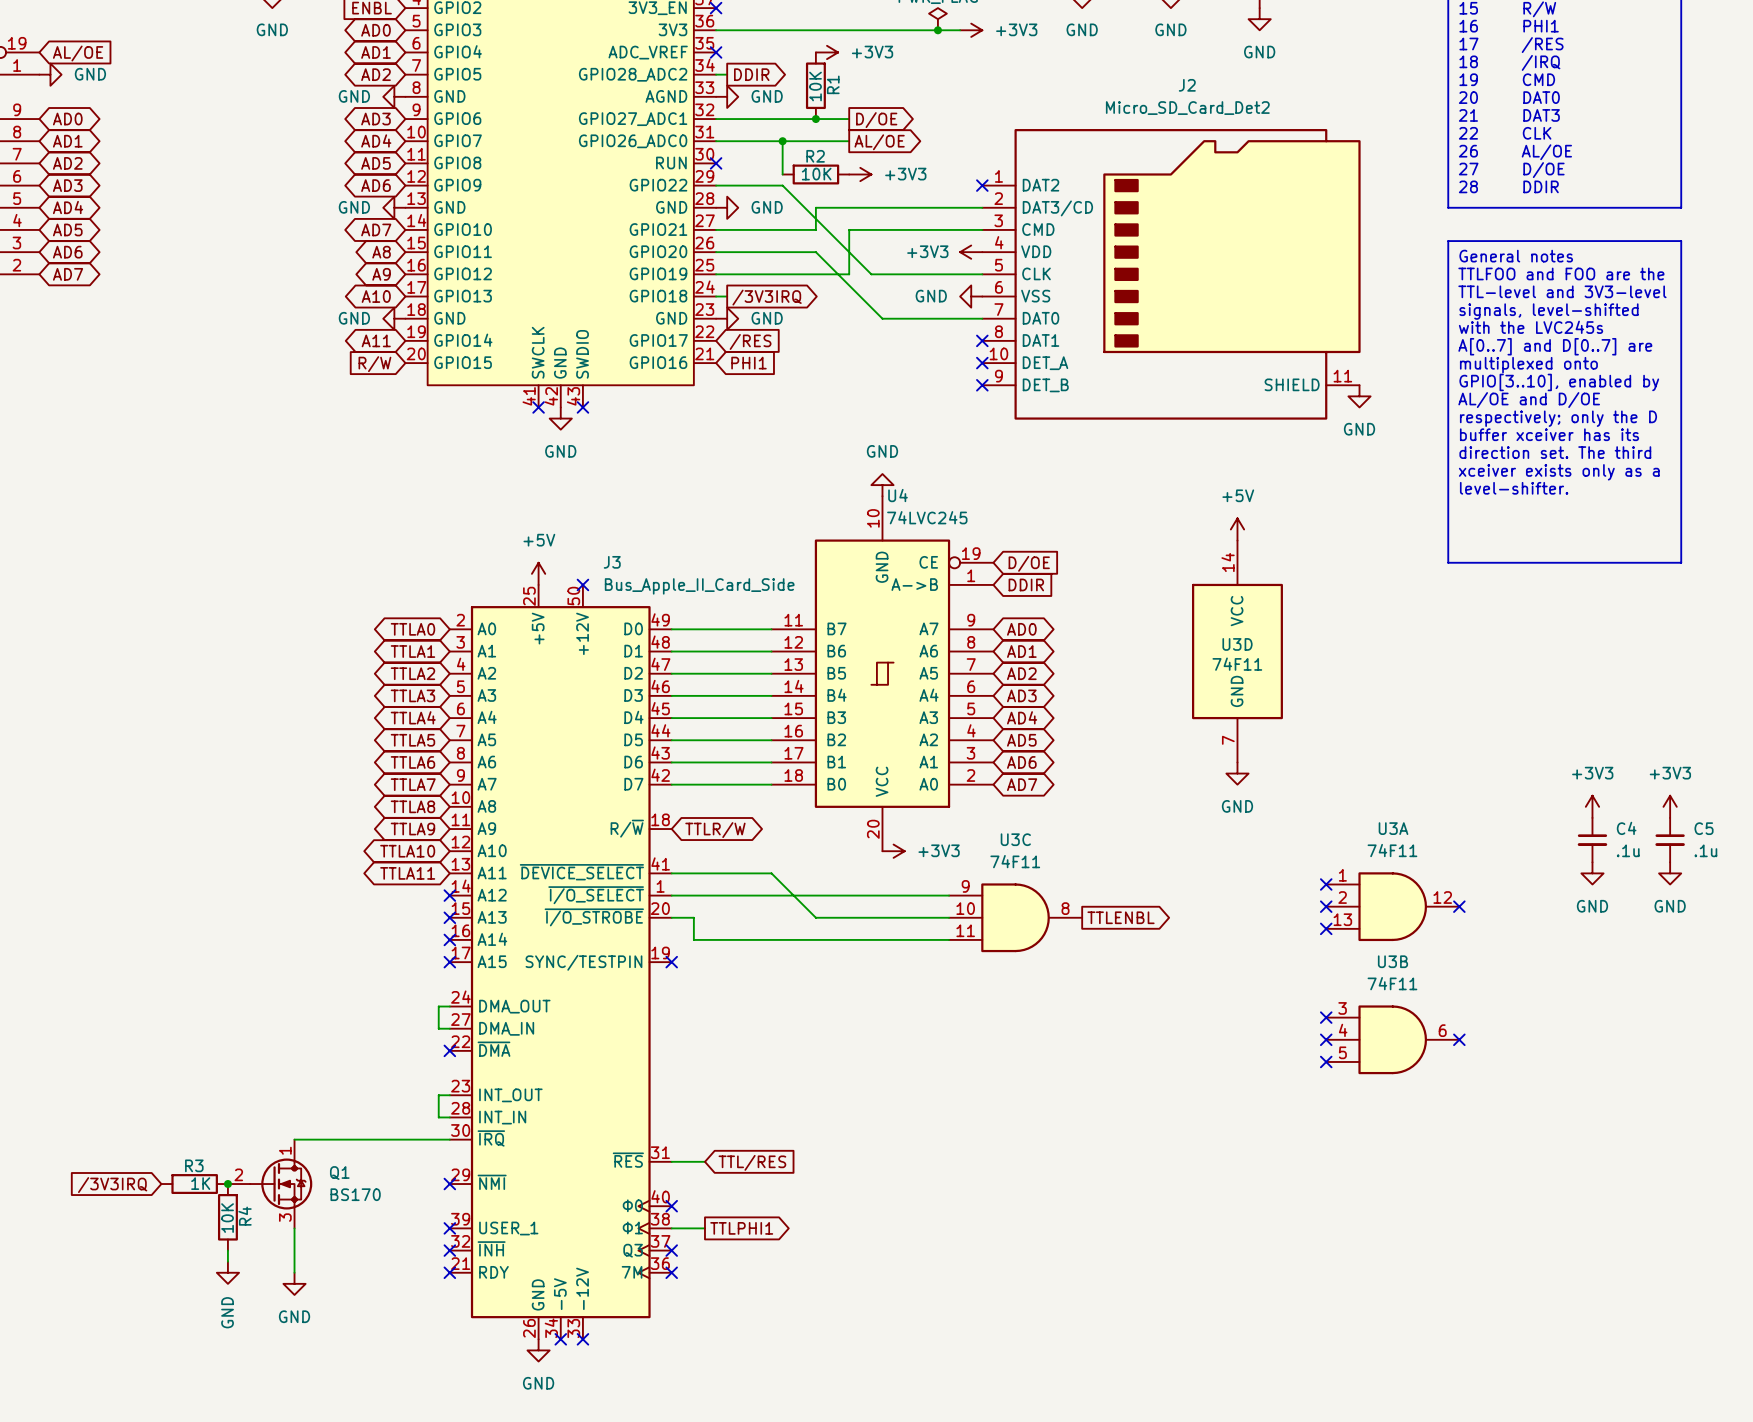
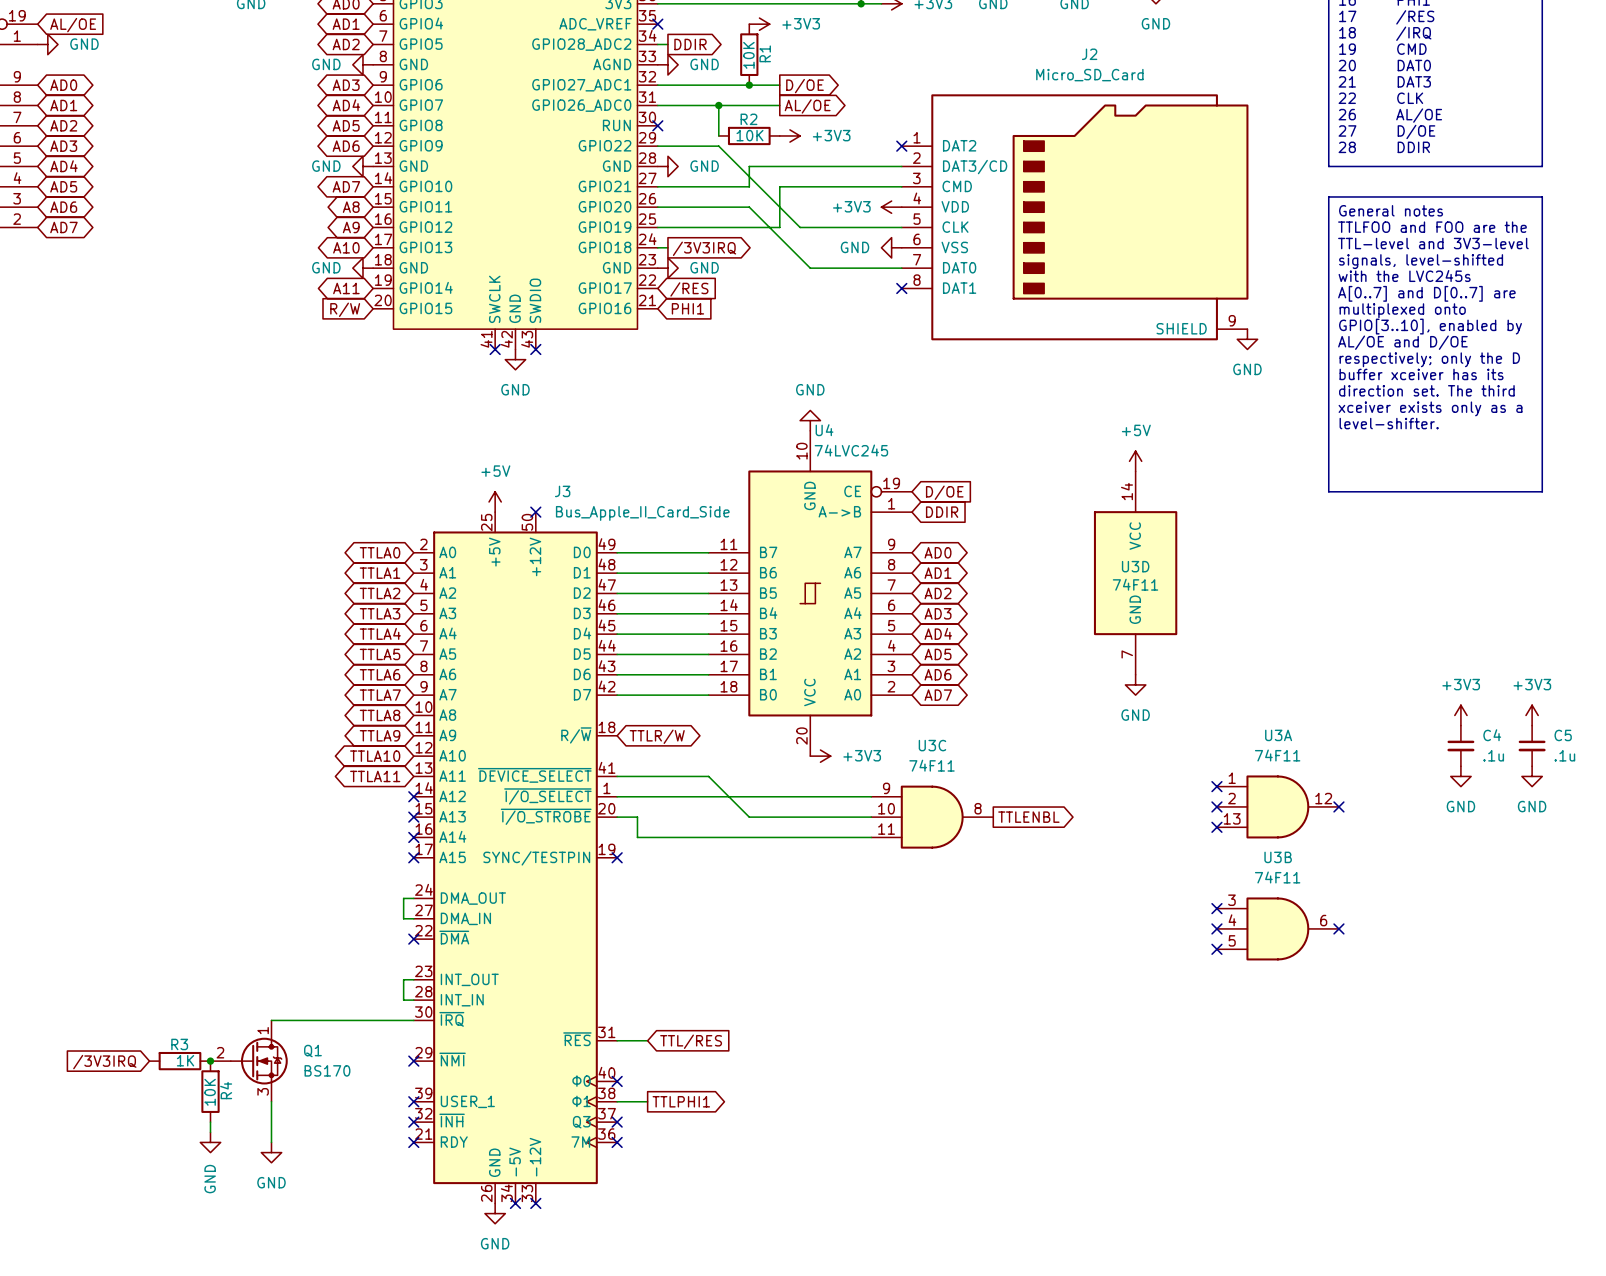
J2 value: Micro_SD_Card_Det2 (1187, 108) -> Micro_SD_Card (1089, 75)
J2 symbol: [982, 129, 1361, 420] -> [901, 94, 1249, 341]
no-connect mark: (982, 363) -> none
no-connect mark: (982, 385) -> none

